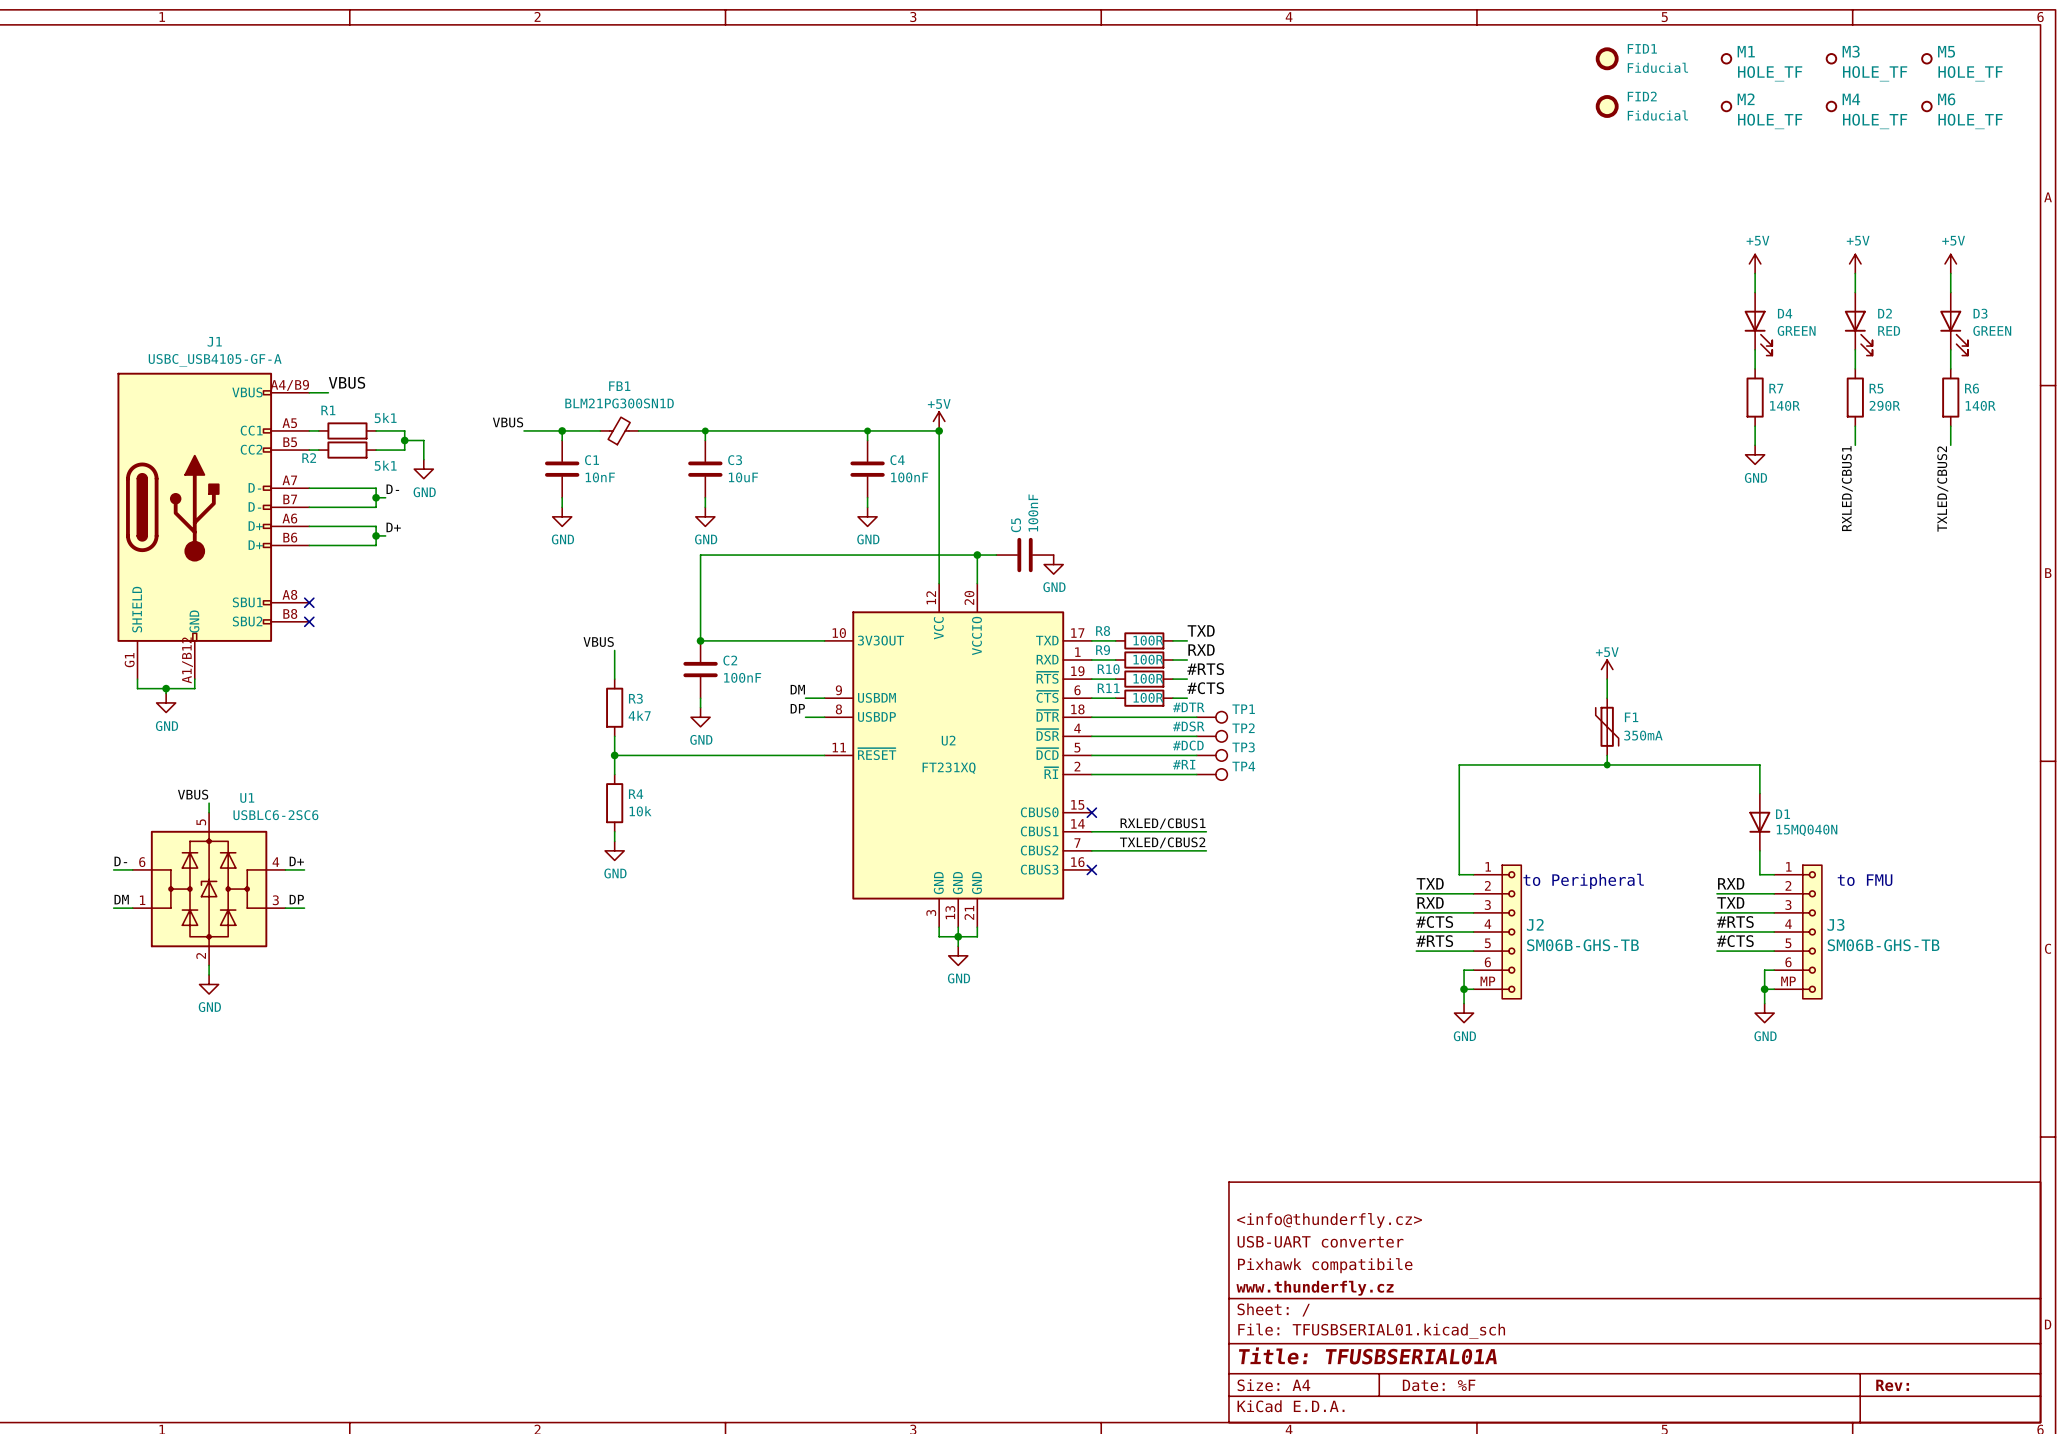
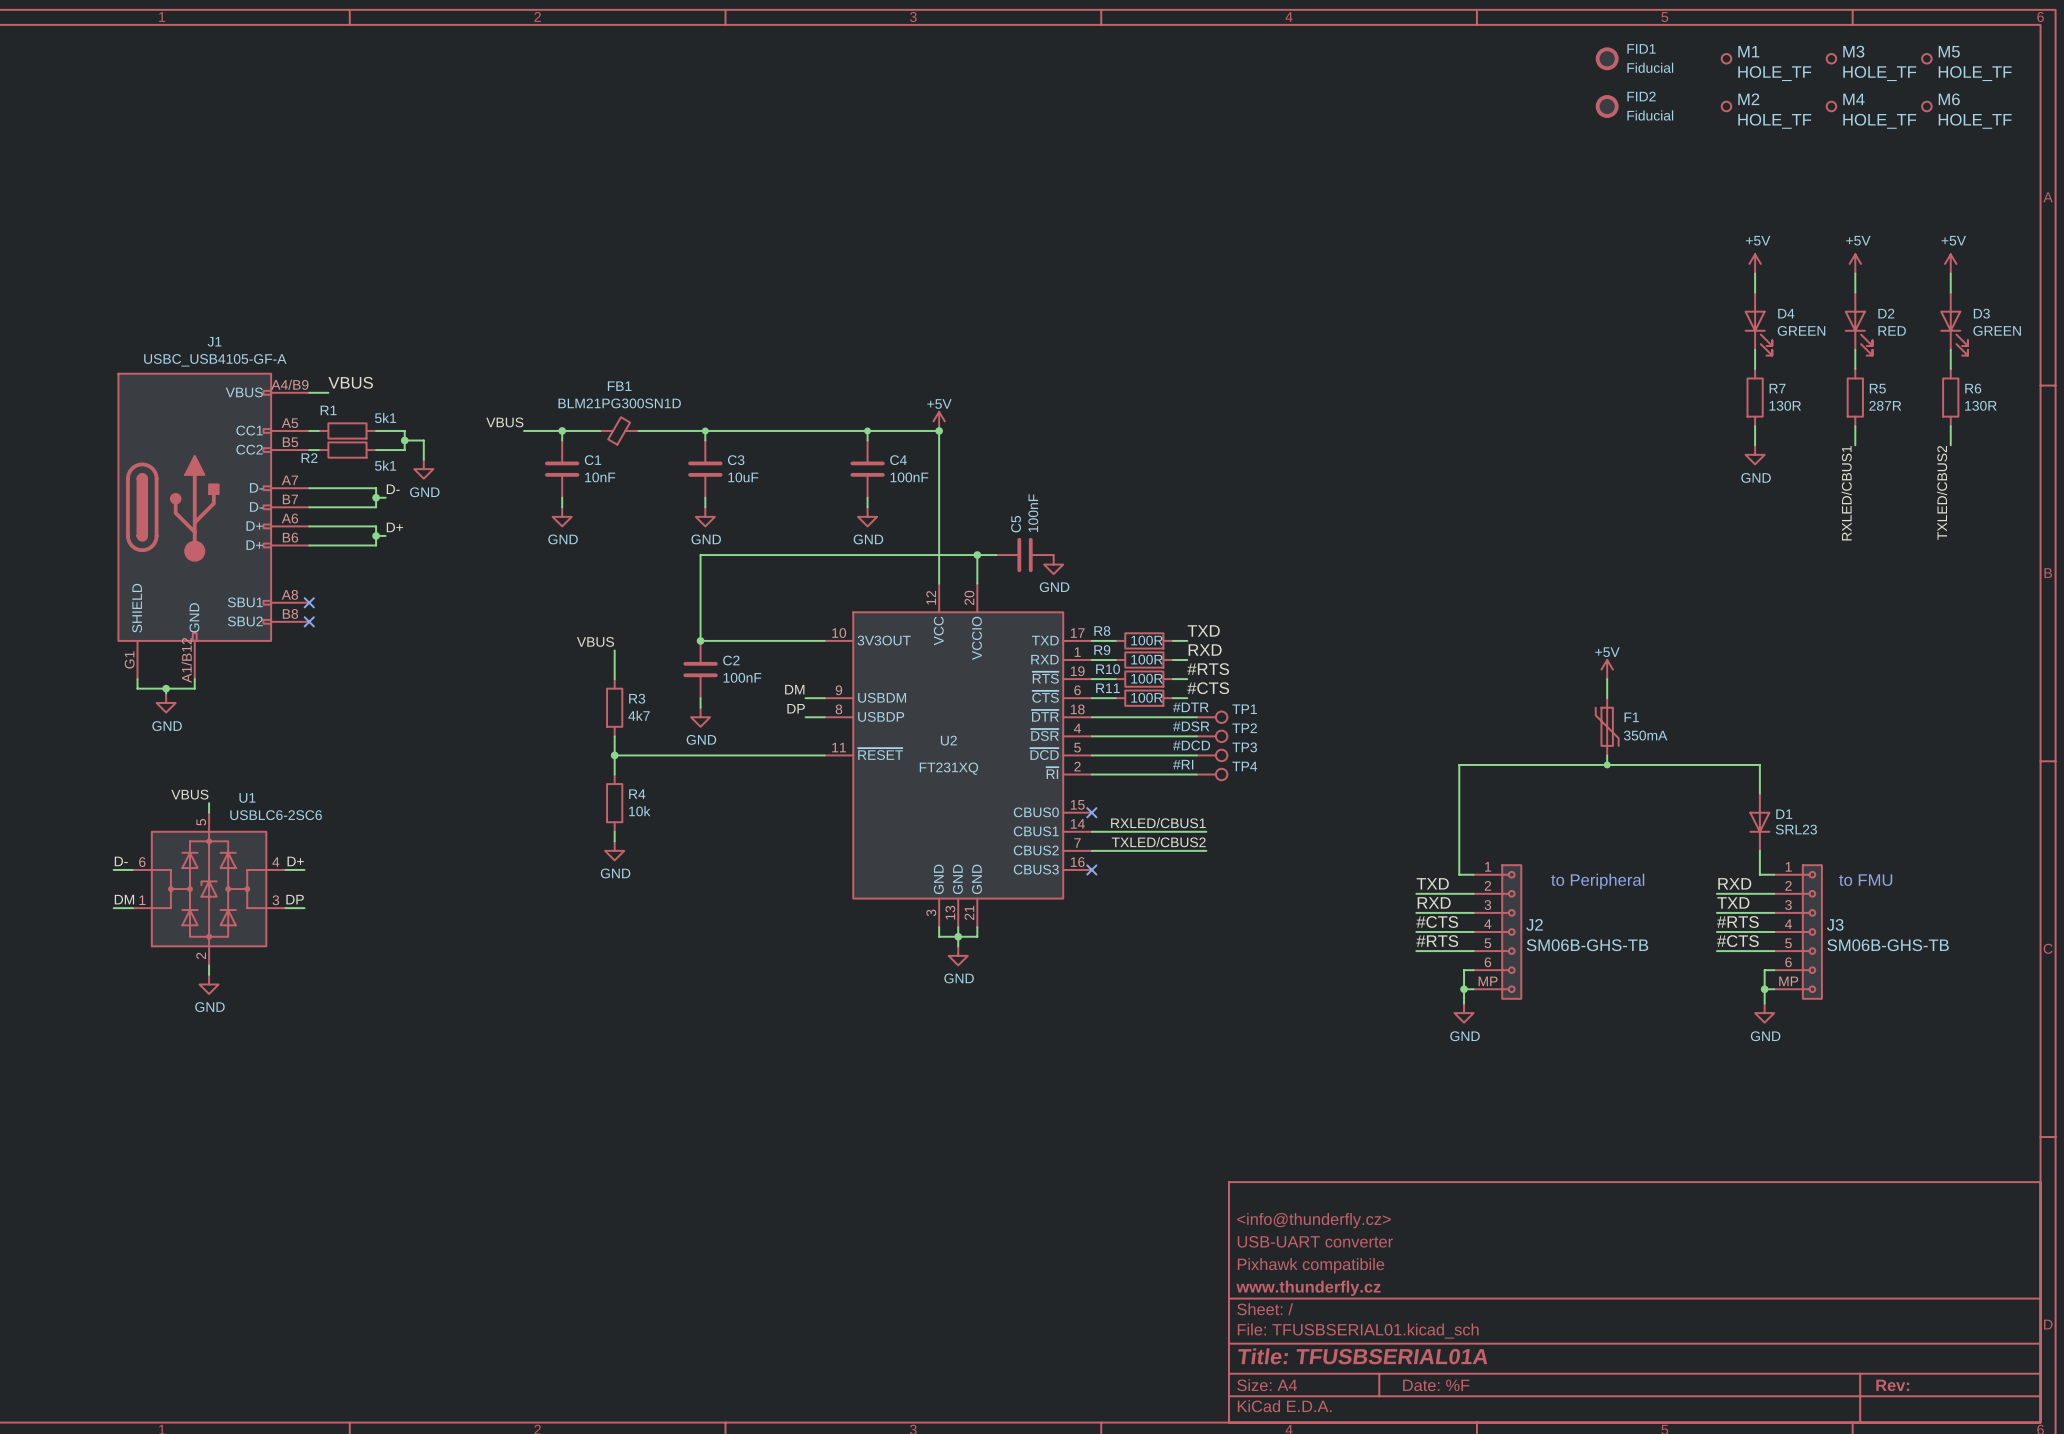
R7 value: 140R (1785, 405) -> 130R (1785, 405)
R5 value: 290R (1884, 405) -> 287R (1885, 405)
R6 value: 140R (1980, 405) -> 130R (1980, 405)
D1 value: 15MQ040N (1807, 830) -> SRL23 (1796, 829)

